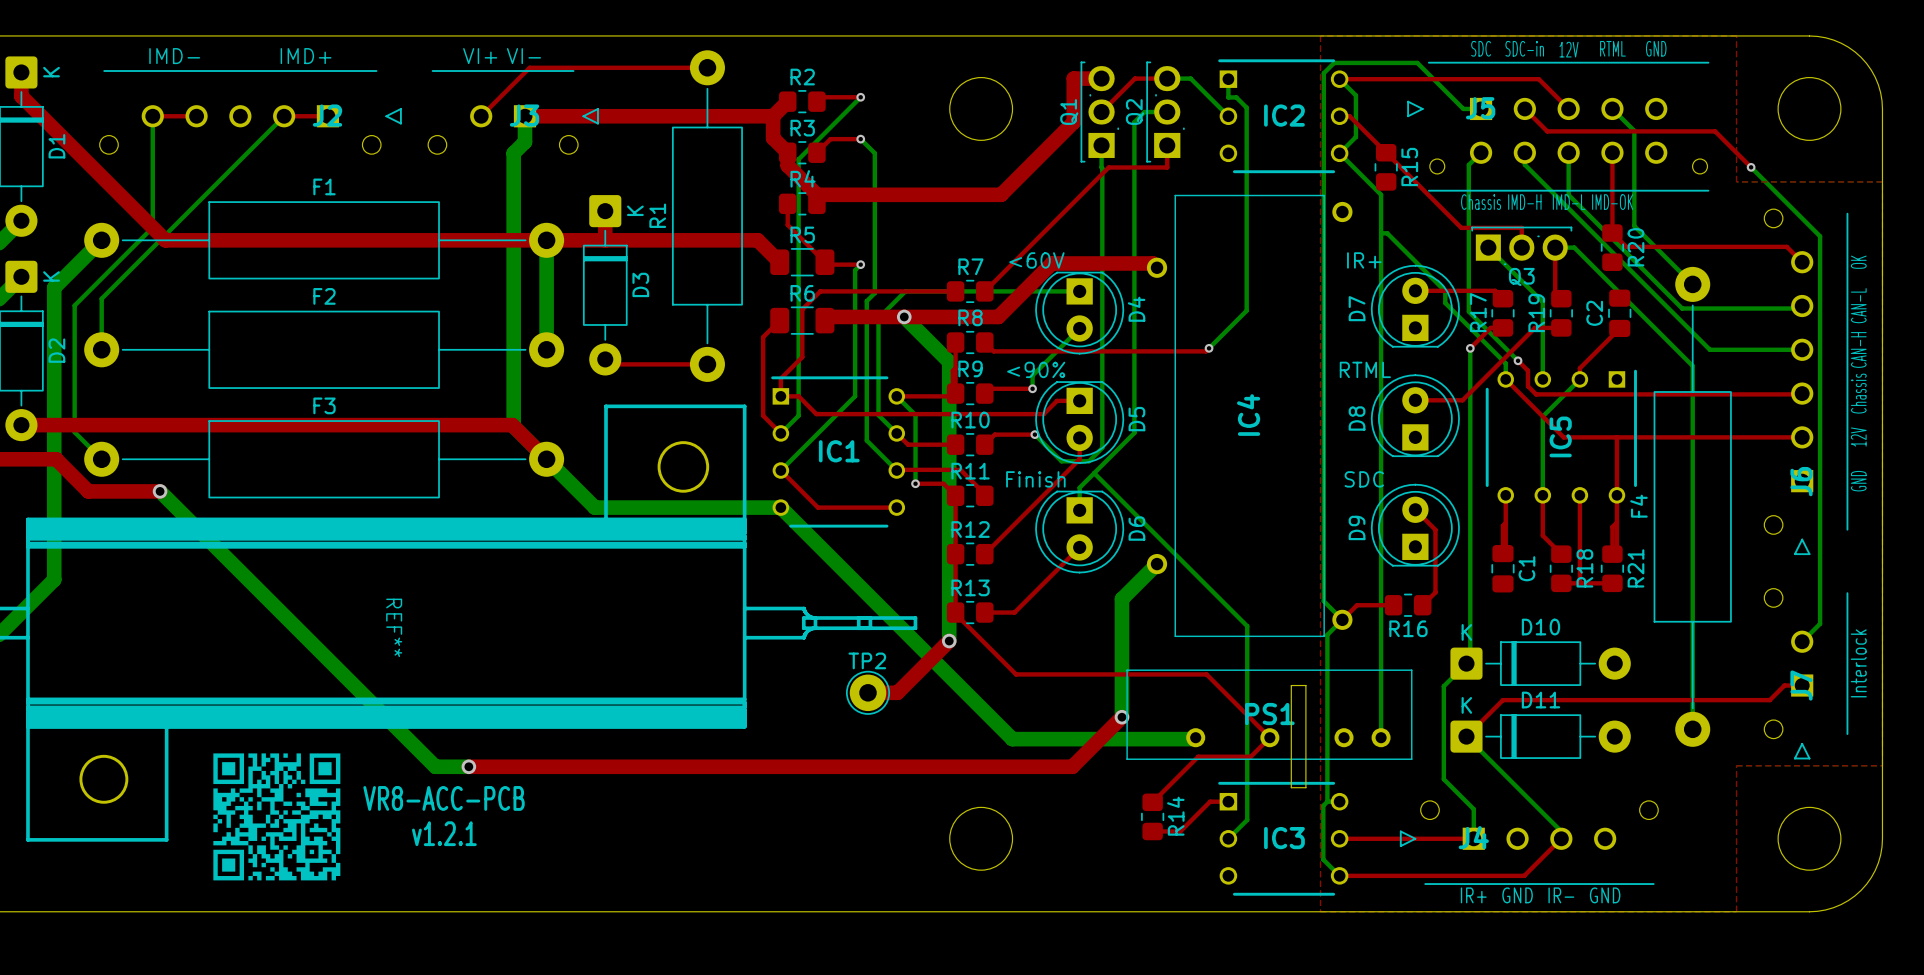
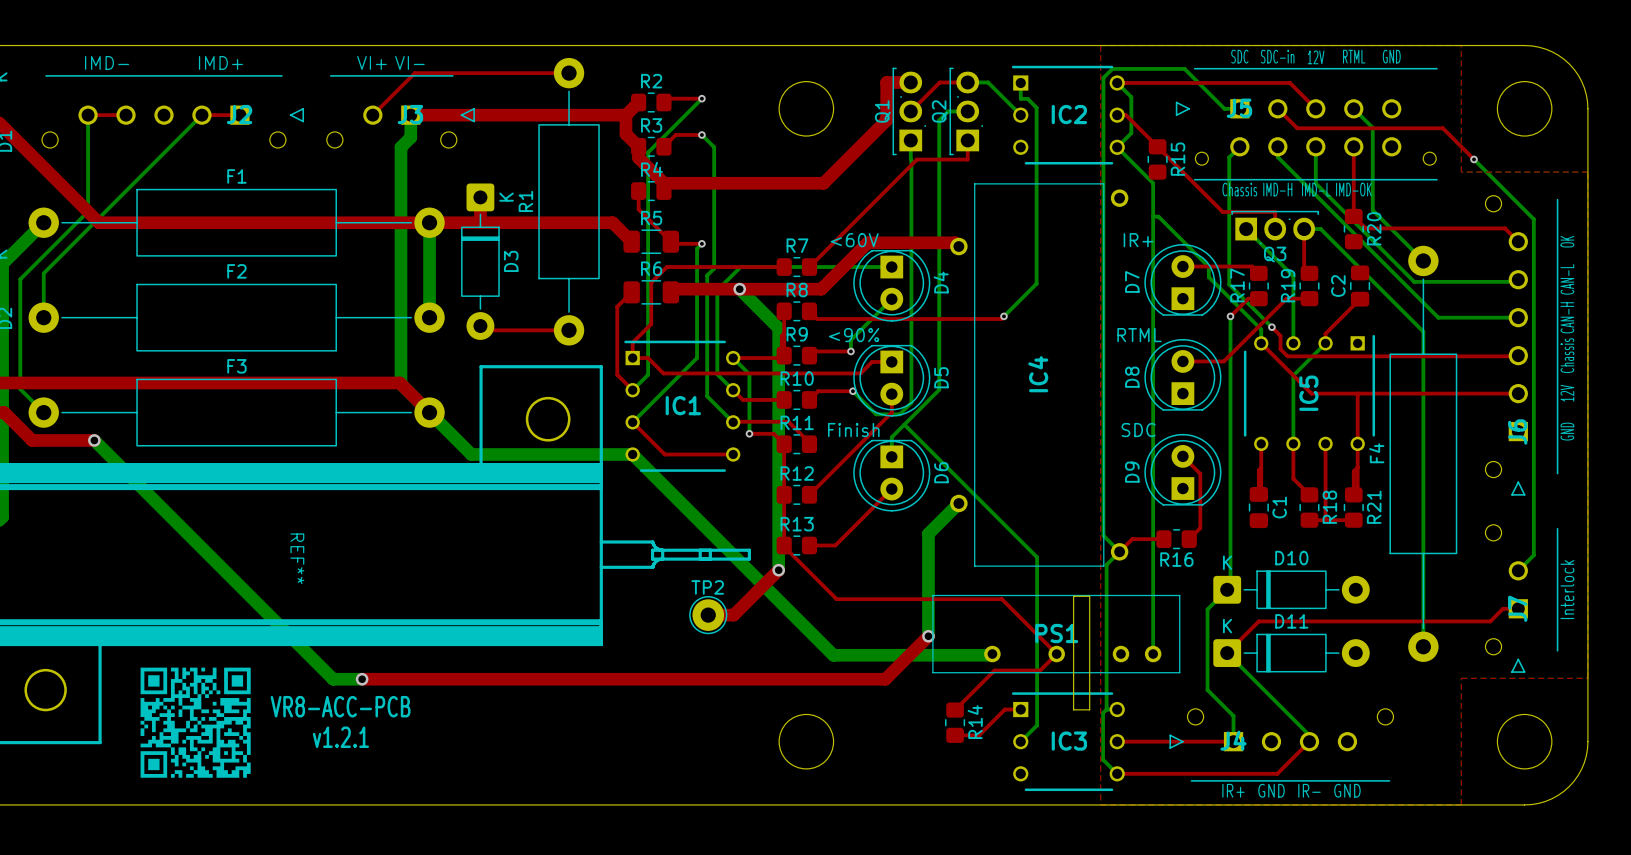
board edge: (1291, 685) (1305, 685) (1305, 787) (1291, 787) (1291, 685) -> (1073, 596) (1073, 709) (1089, 709) (1089, 596) (1073, 596)

